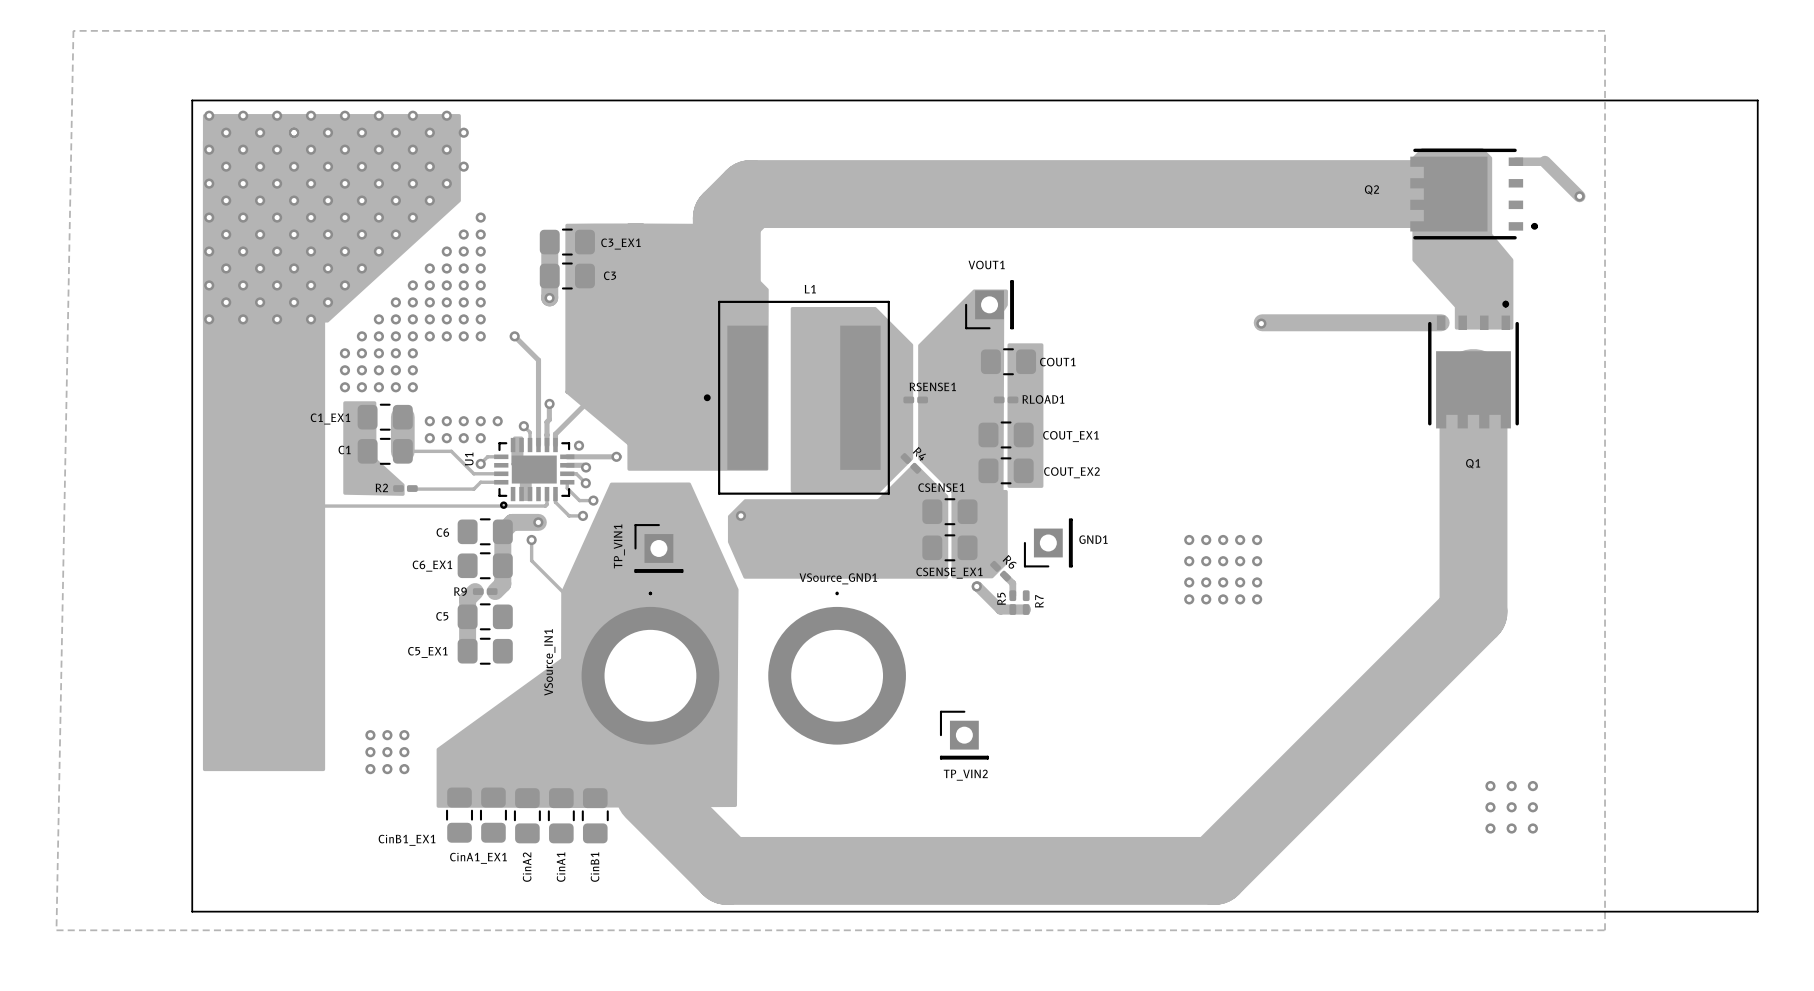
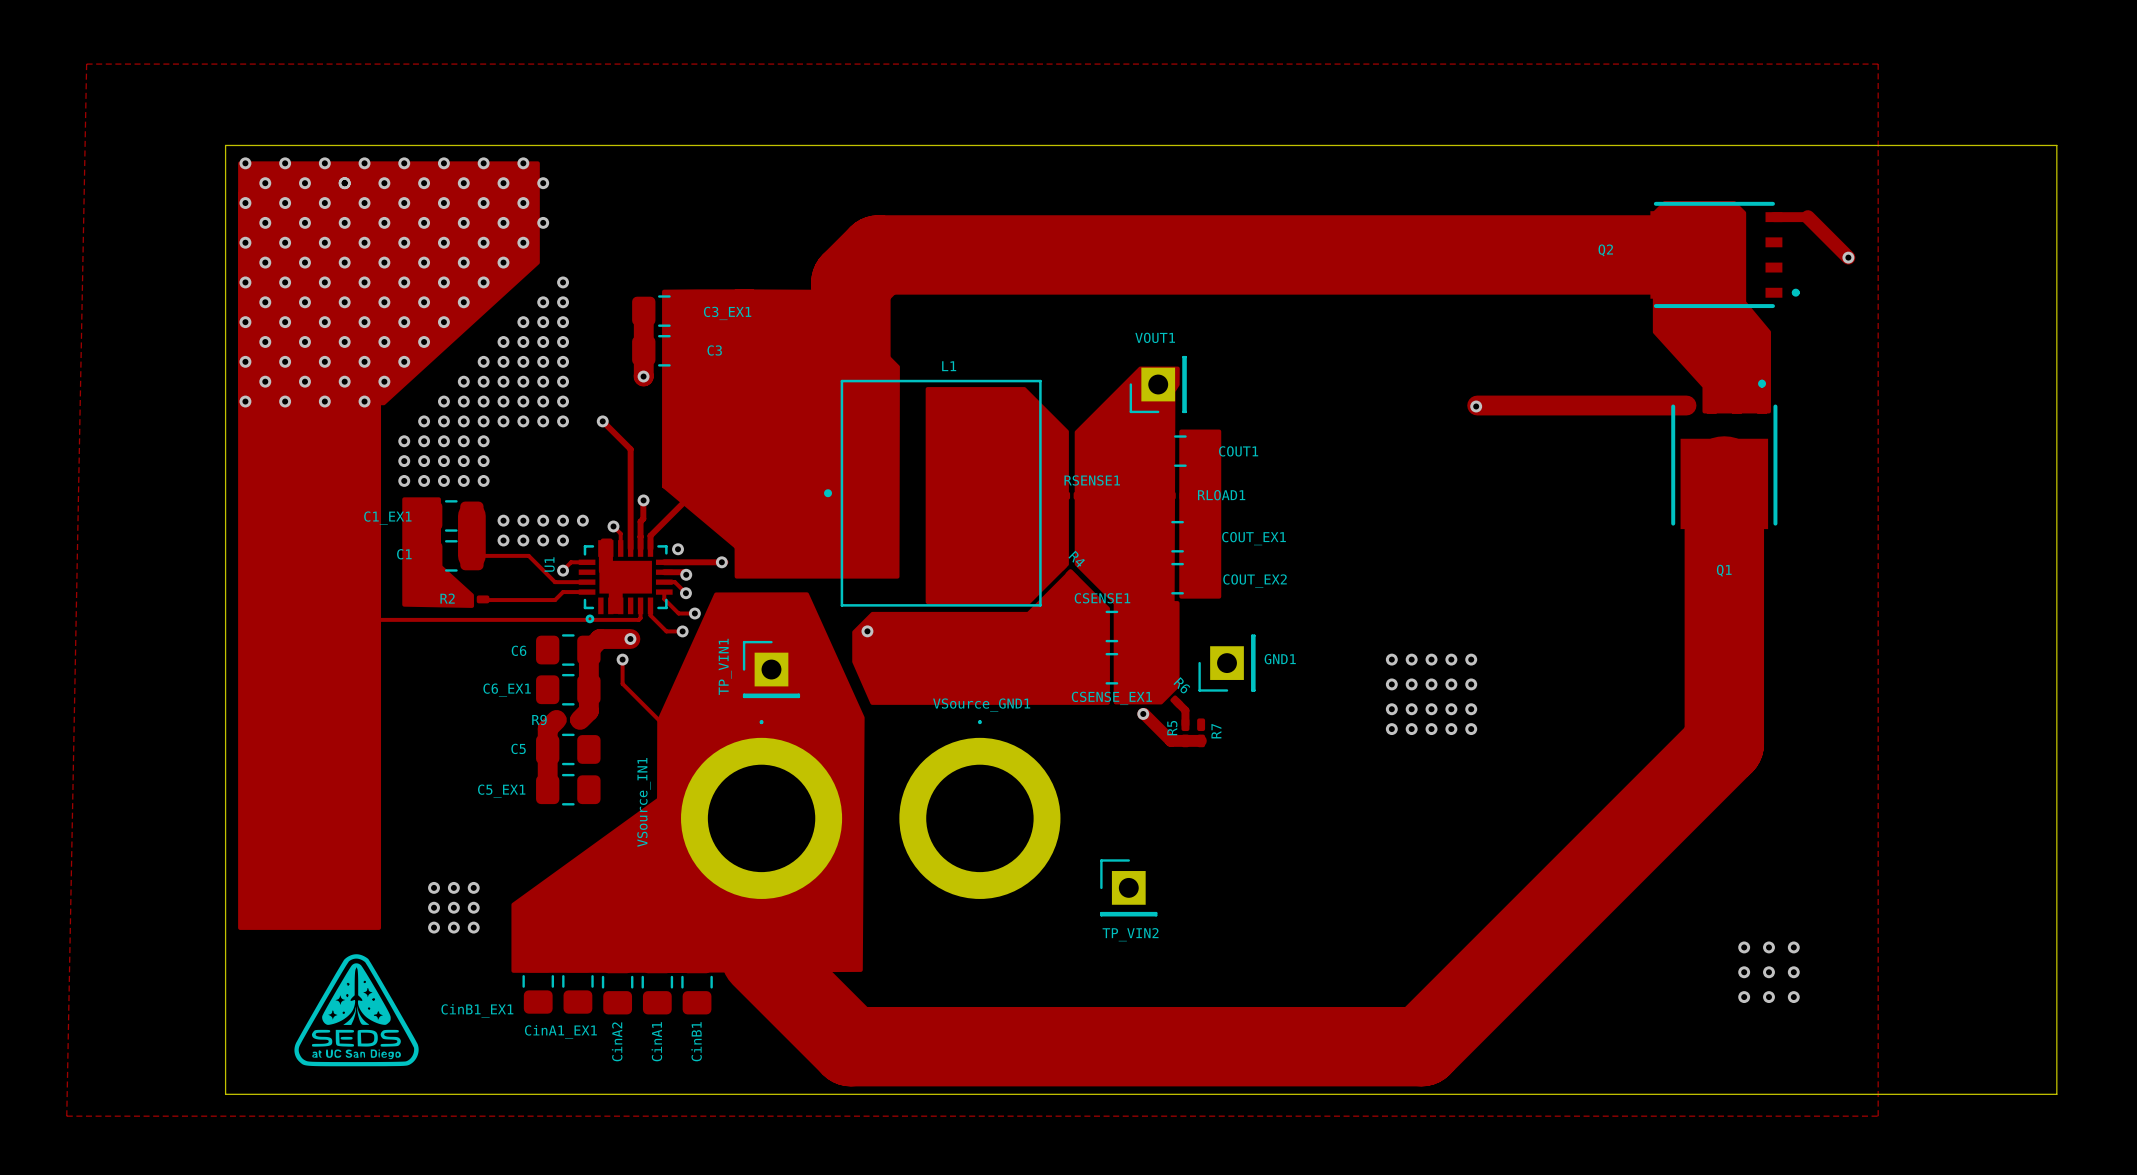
drawing: none -> [294, 954, 419, 1067]

